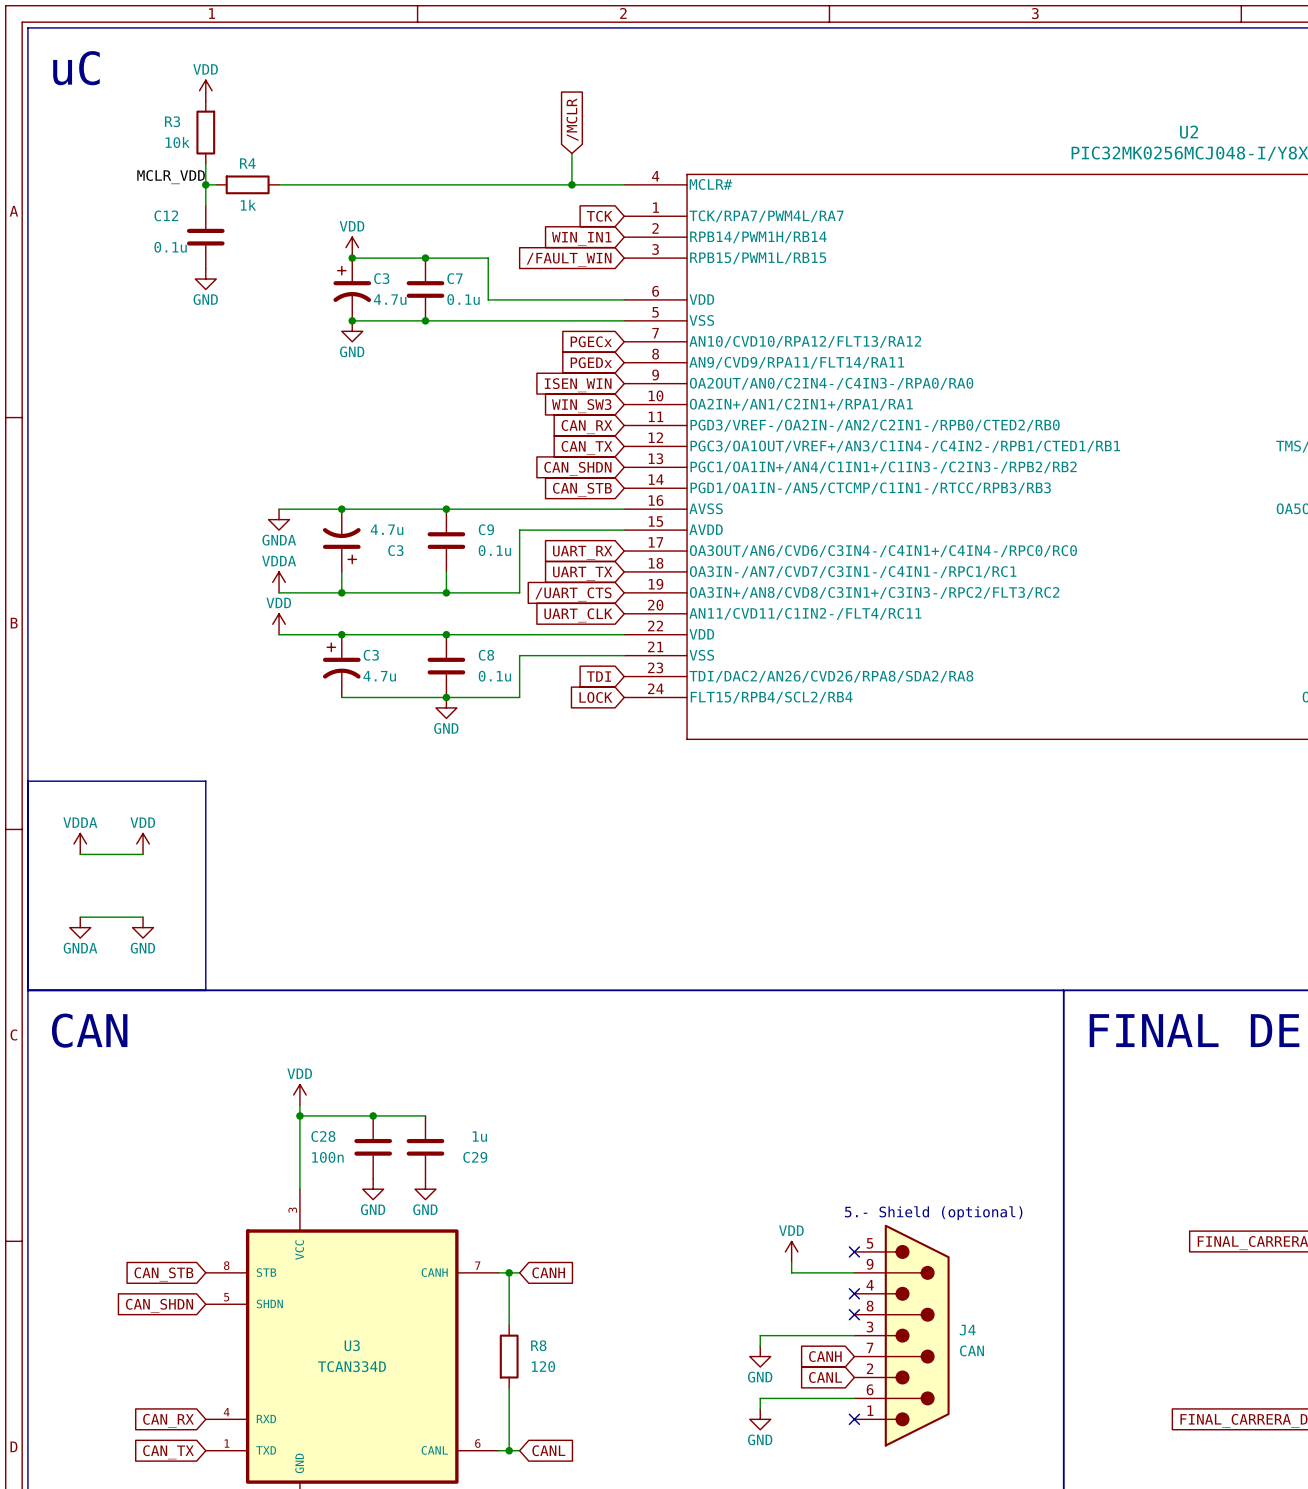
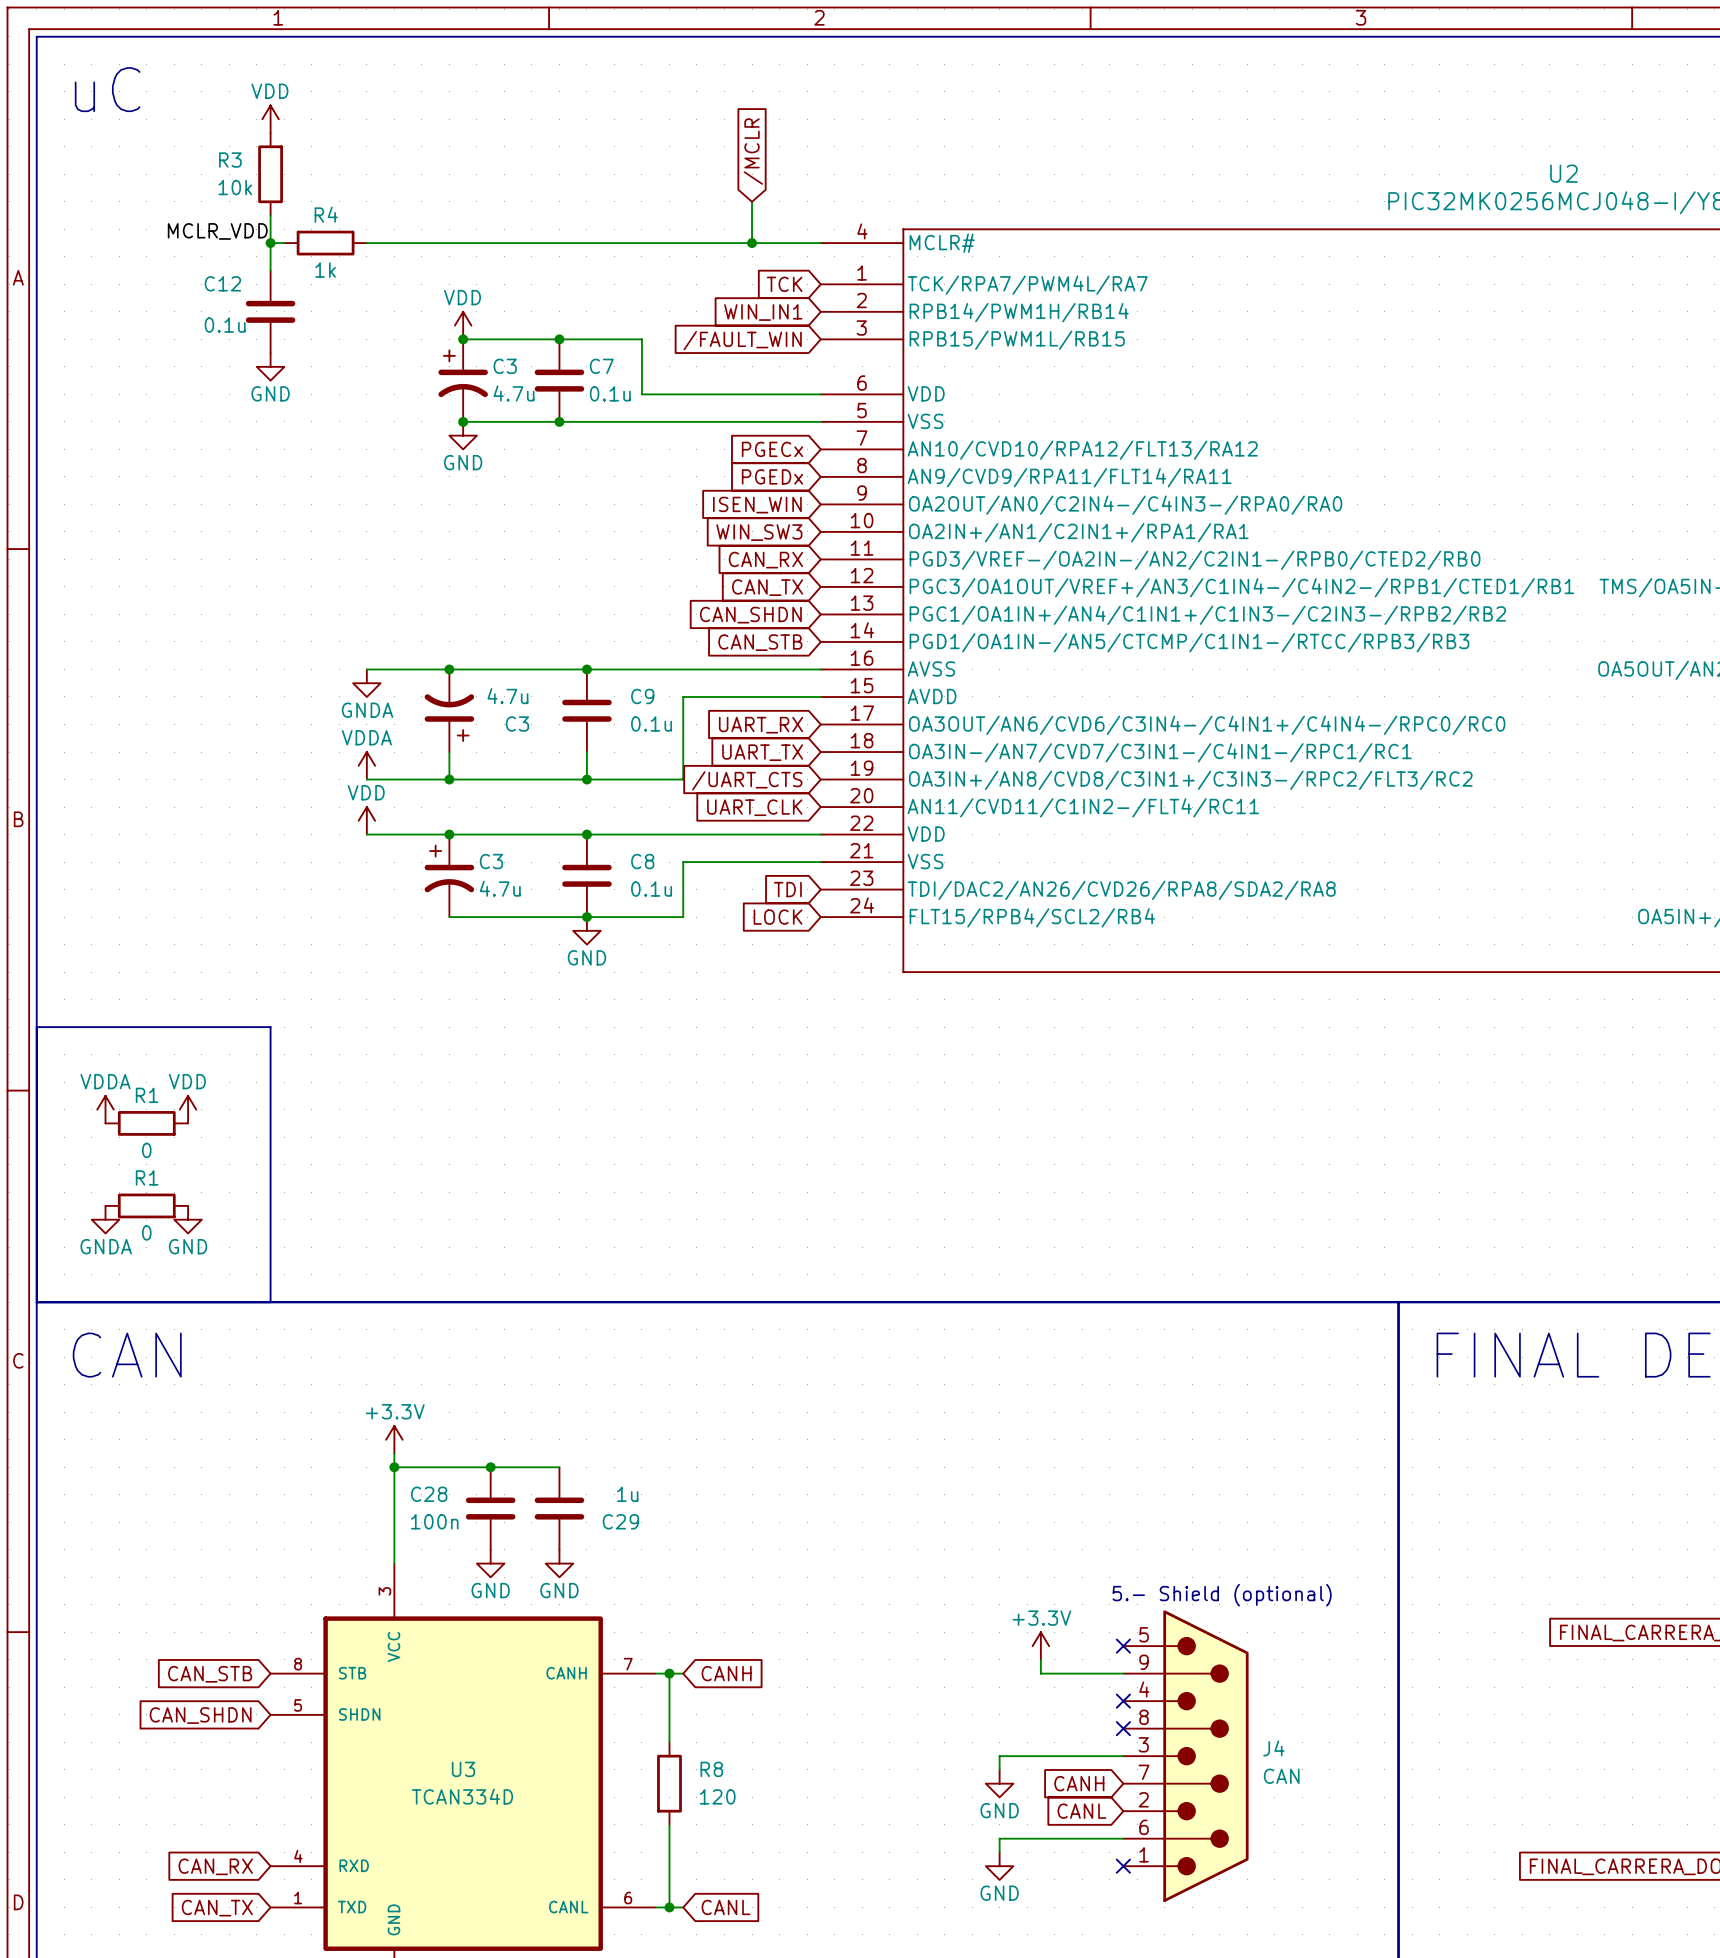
wire: (80, 854) (143, 854) -> none
R1: none -> 0 (146, 1123)
wire: (80, 917) (143, 917) -> none
R1: none -> 0 (146, 1205)
power symbol: VDD (299, 1095) -> +3.3V (394, 1439)
power symbol: VDD (791, 1251) -> +3.3V (1040, 1646)

